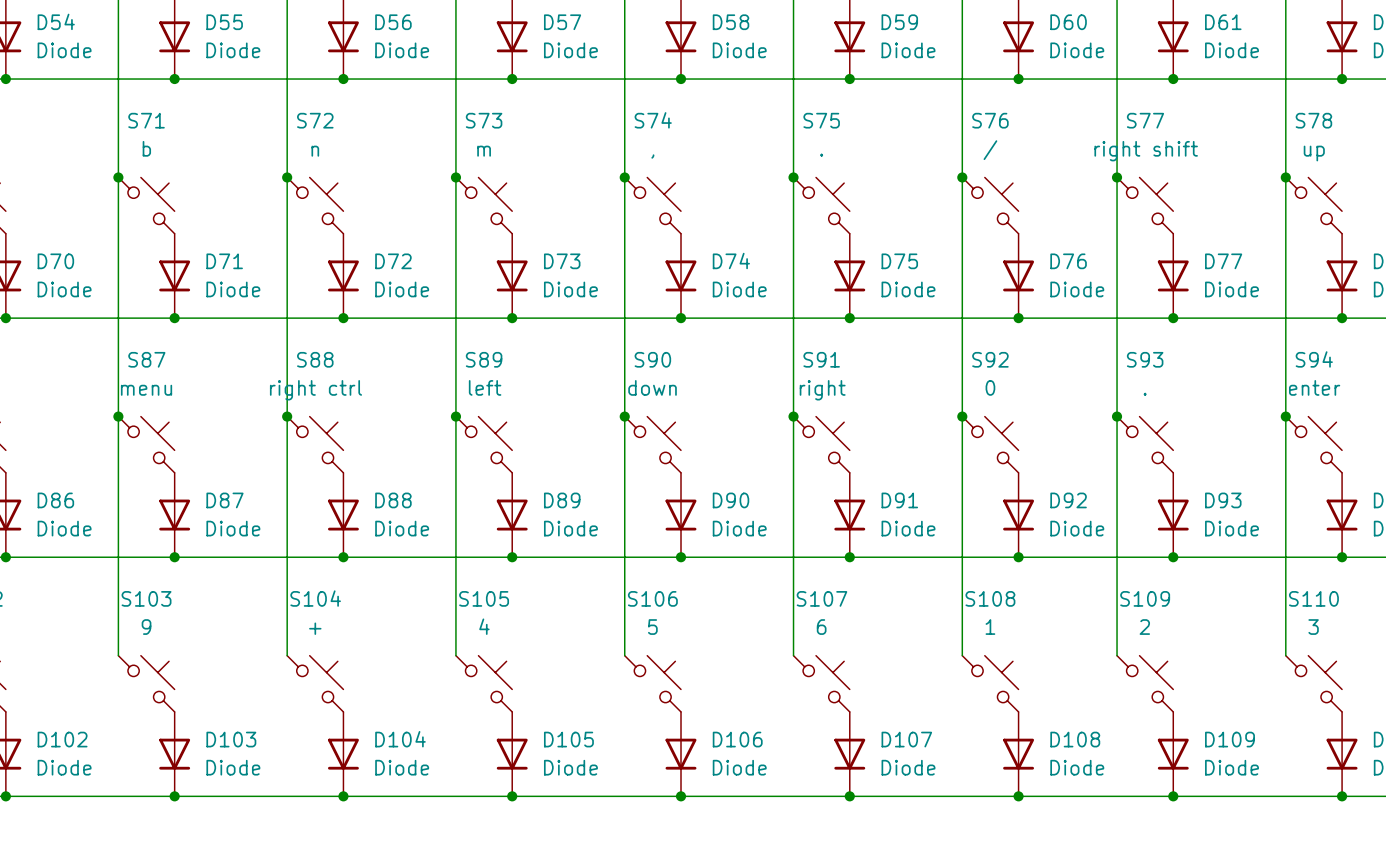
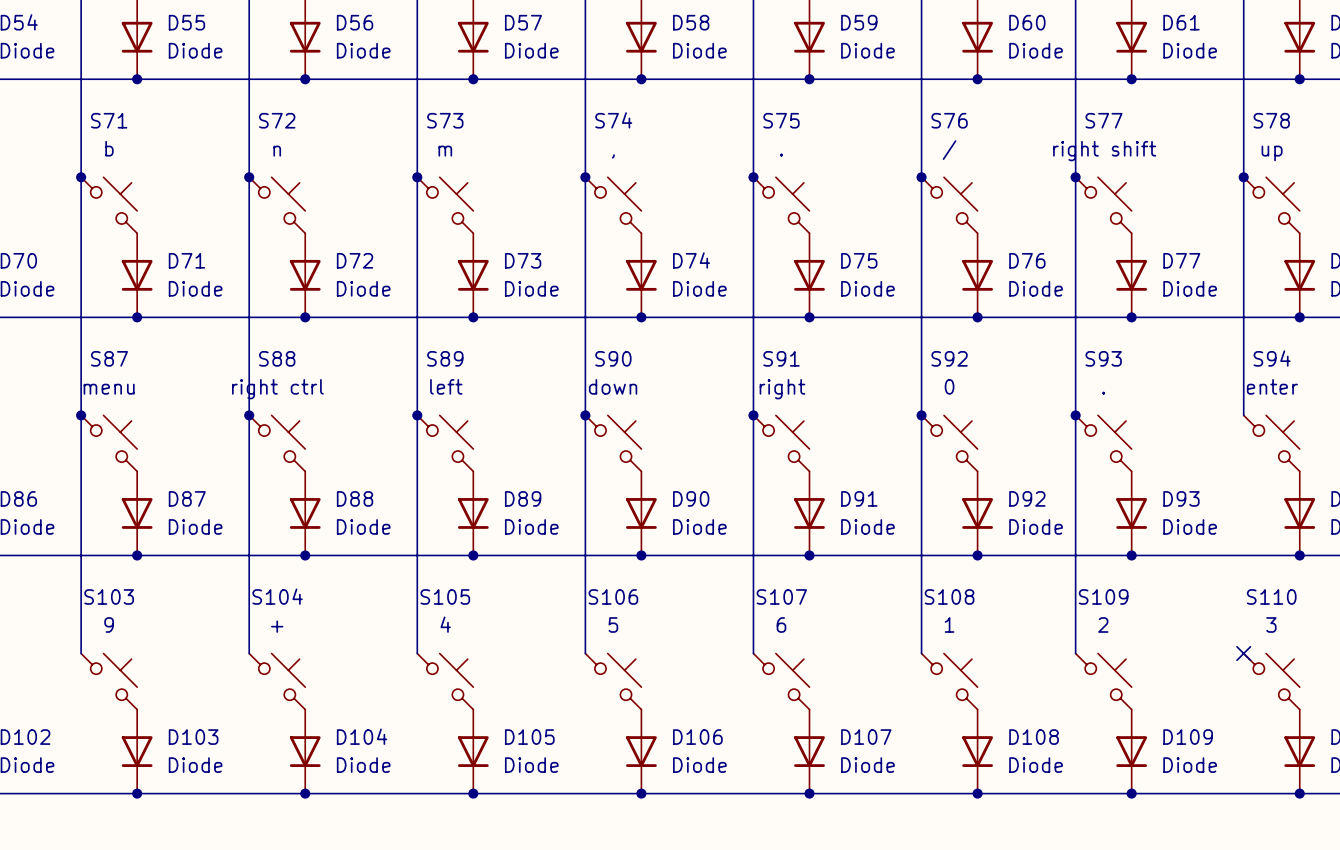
wire: (1285, 416) (1285, 655) -> none
junction: (1285, 416) -> none
no-connect mark: none -> (1243, 653)

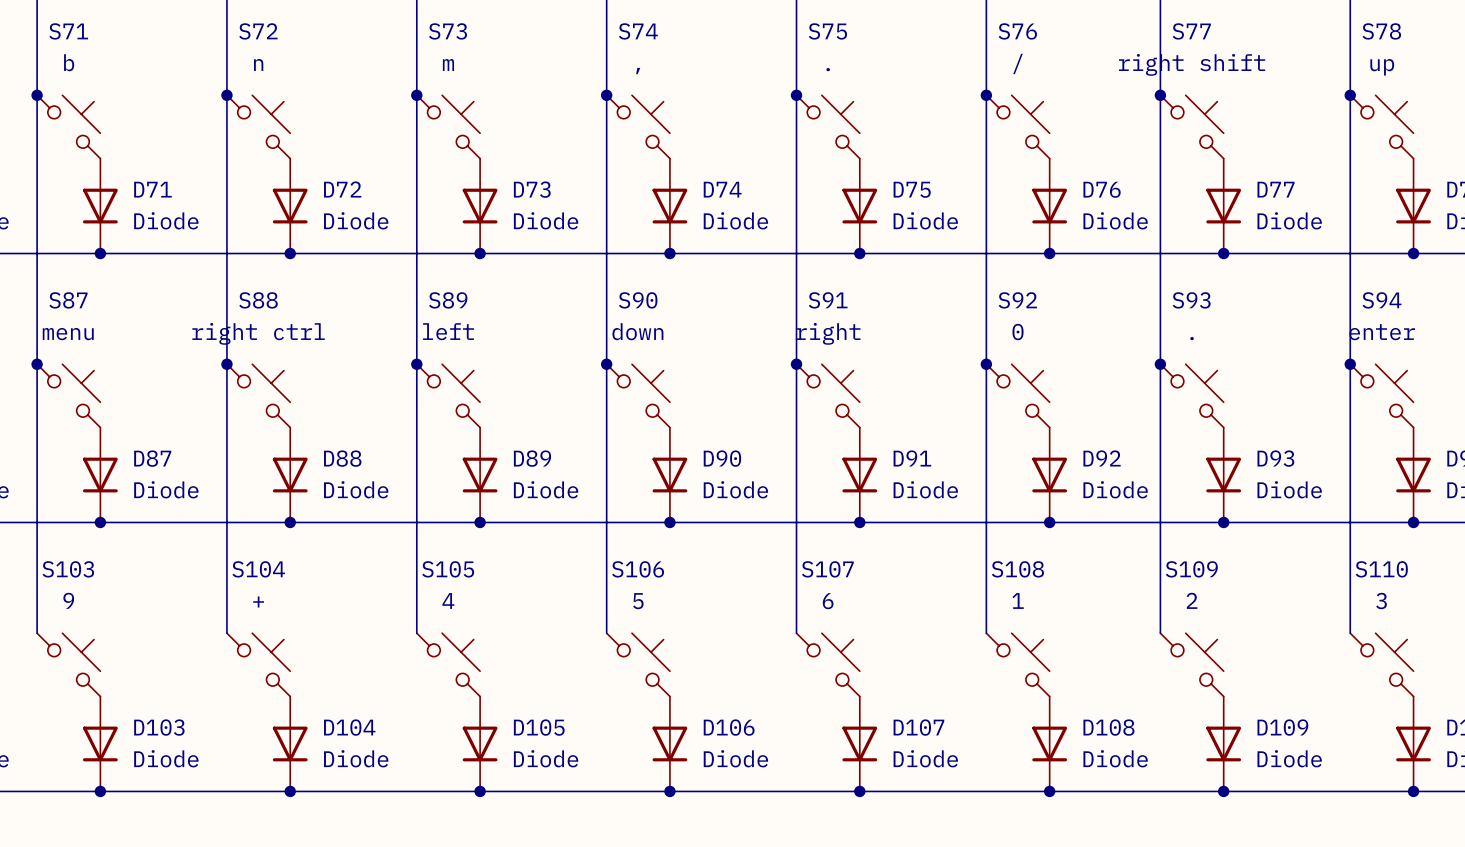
wire: none -> (1350, 364) (1350, 633)
junction: none -> (1350, 364)
no-connect mark: (1243, 653) -> none

